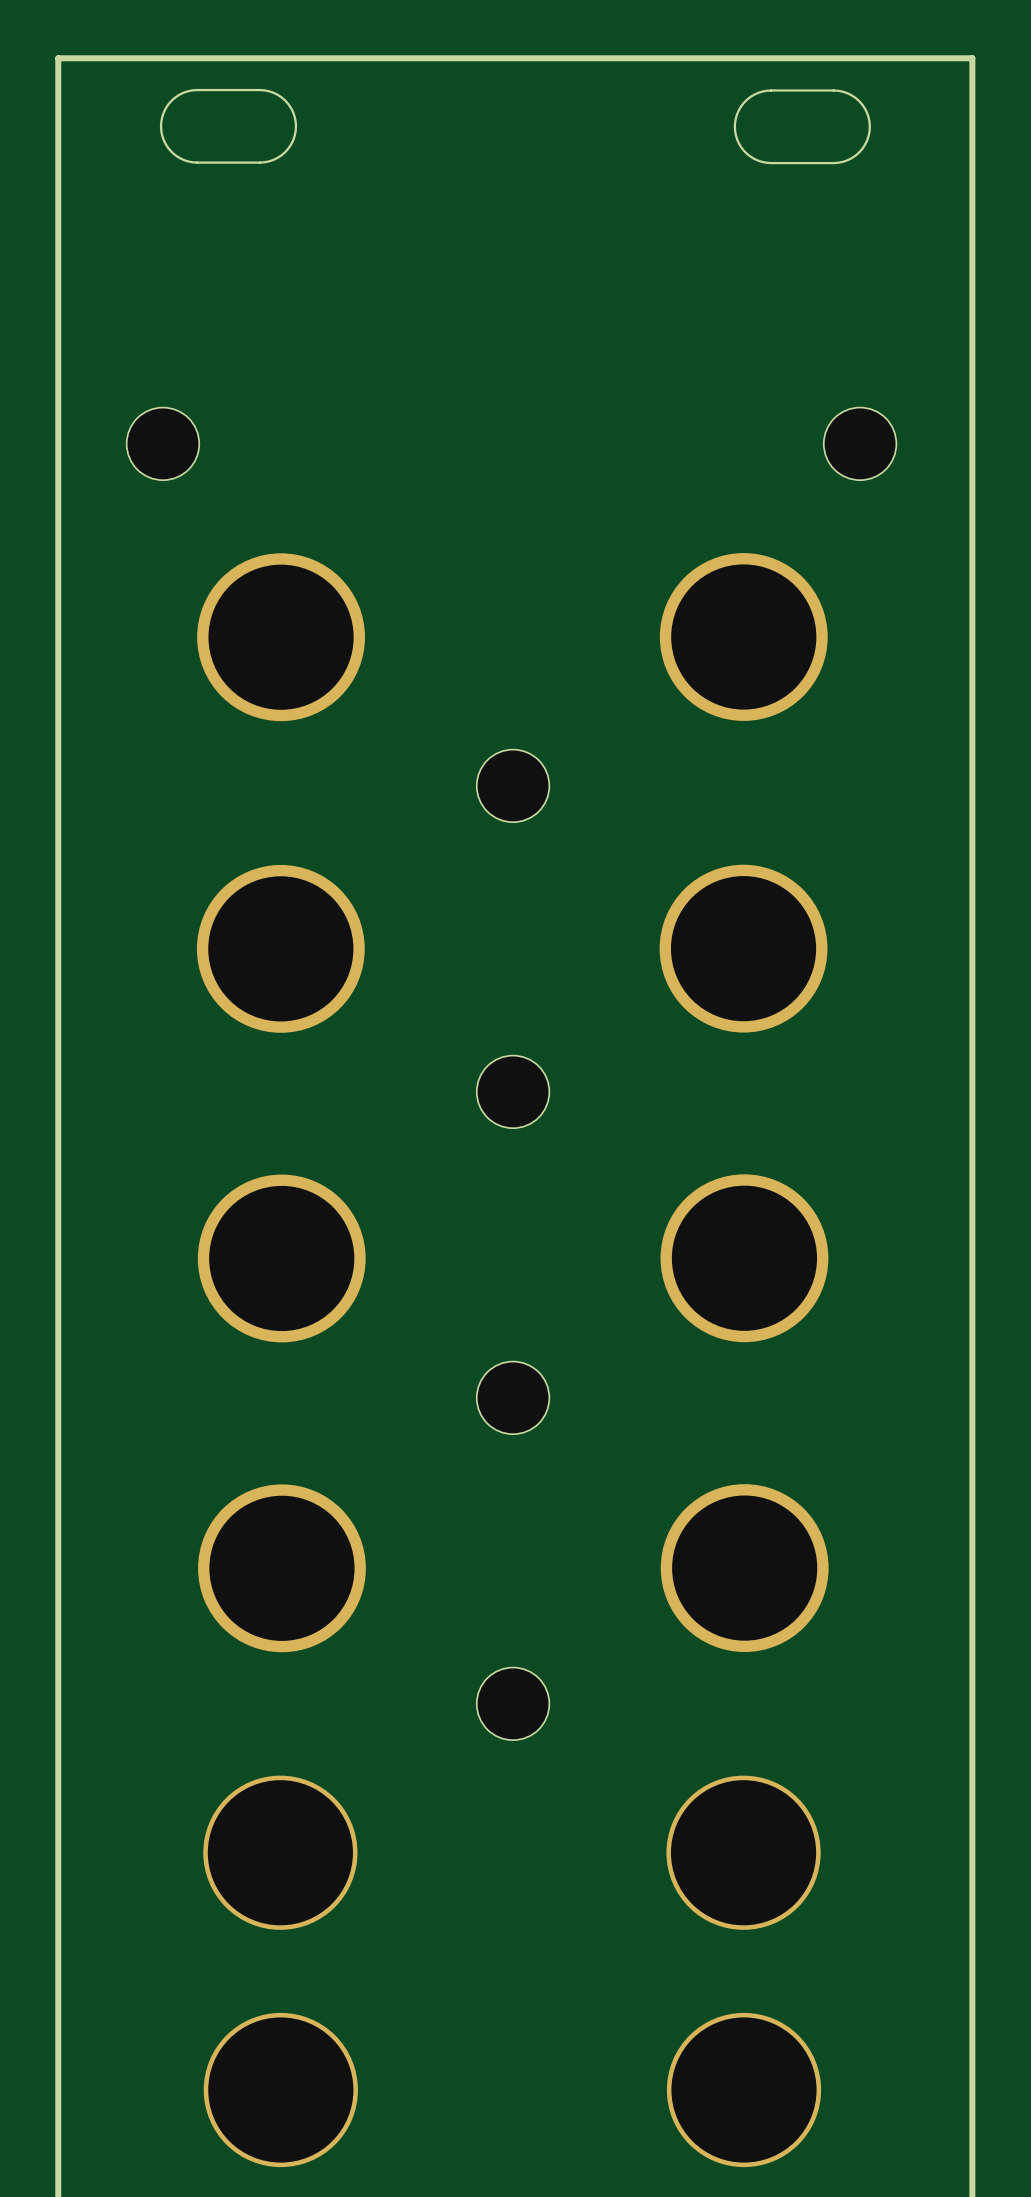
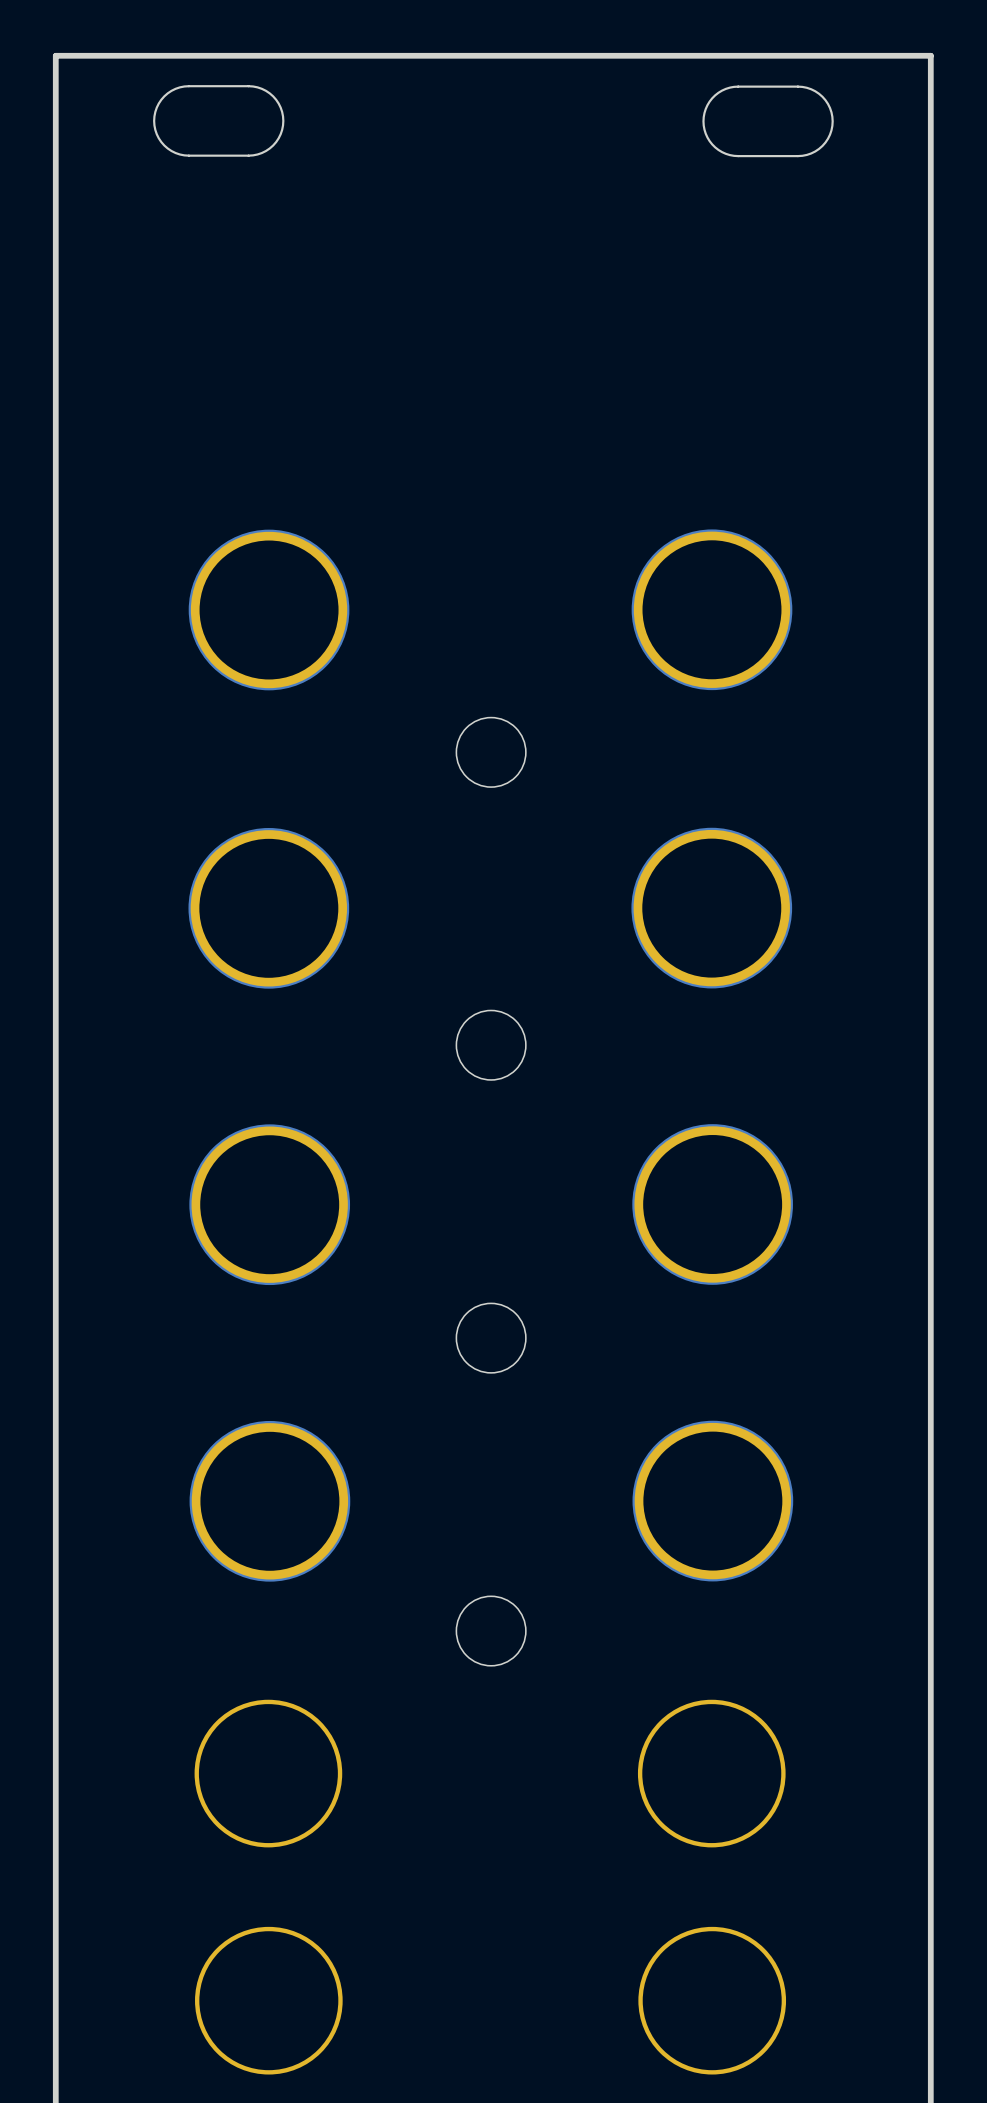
part: (162, 443) -> none
part: (860, 443) -> none

